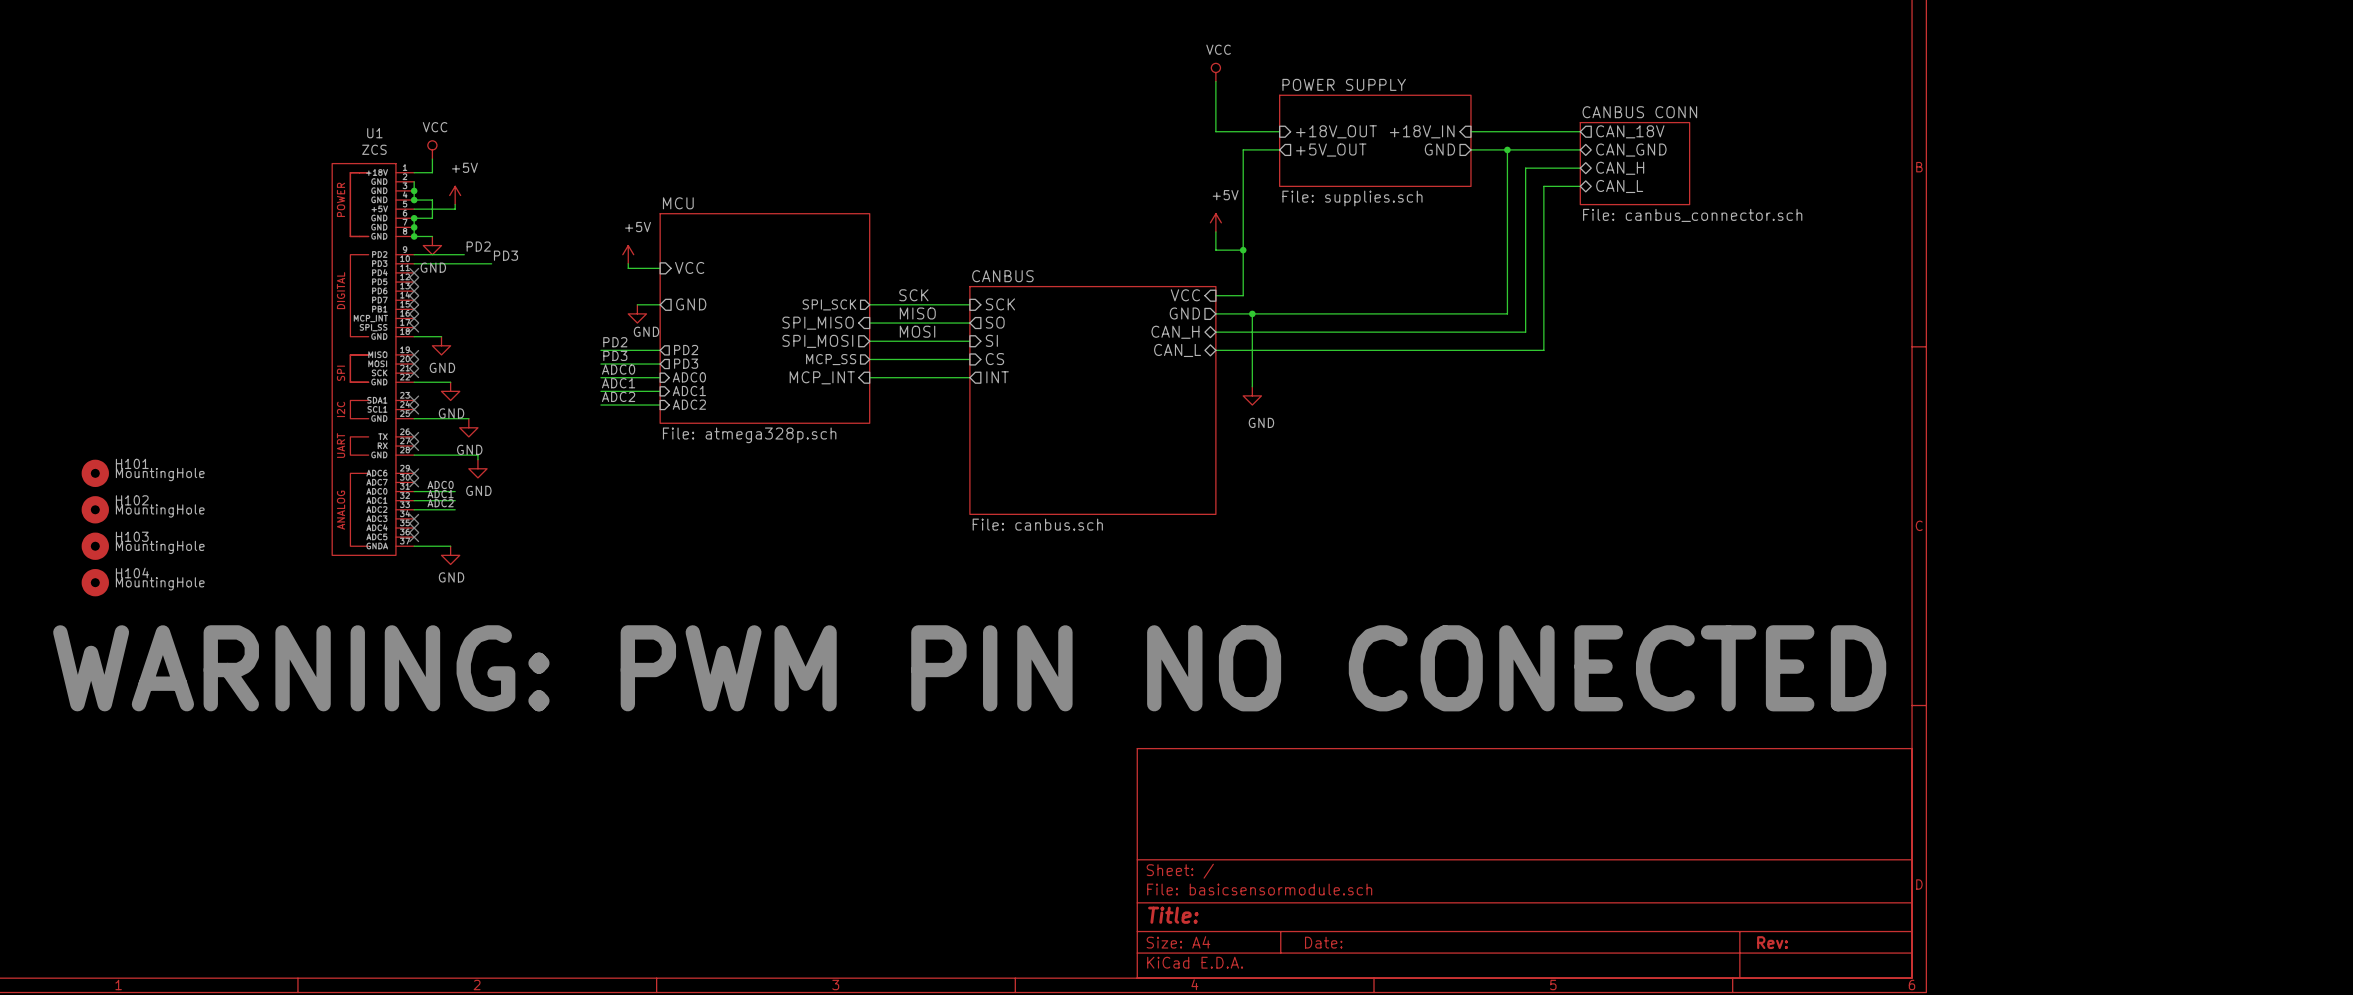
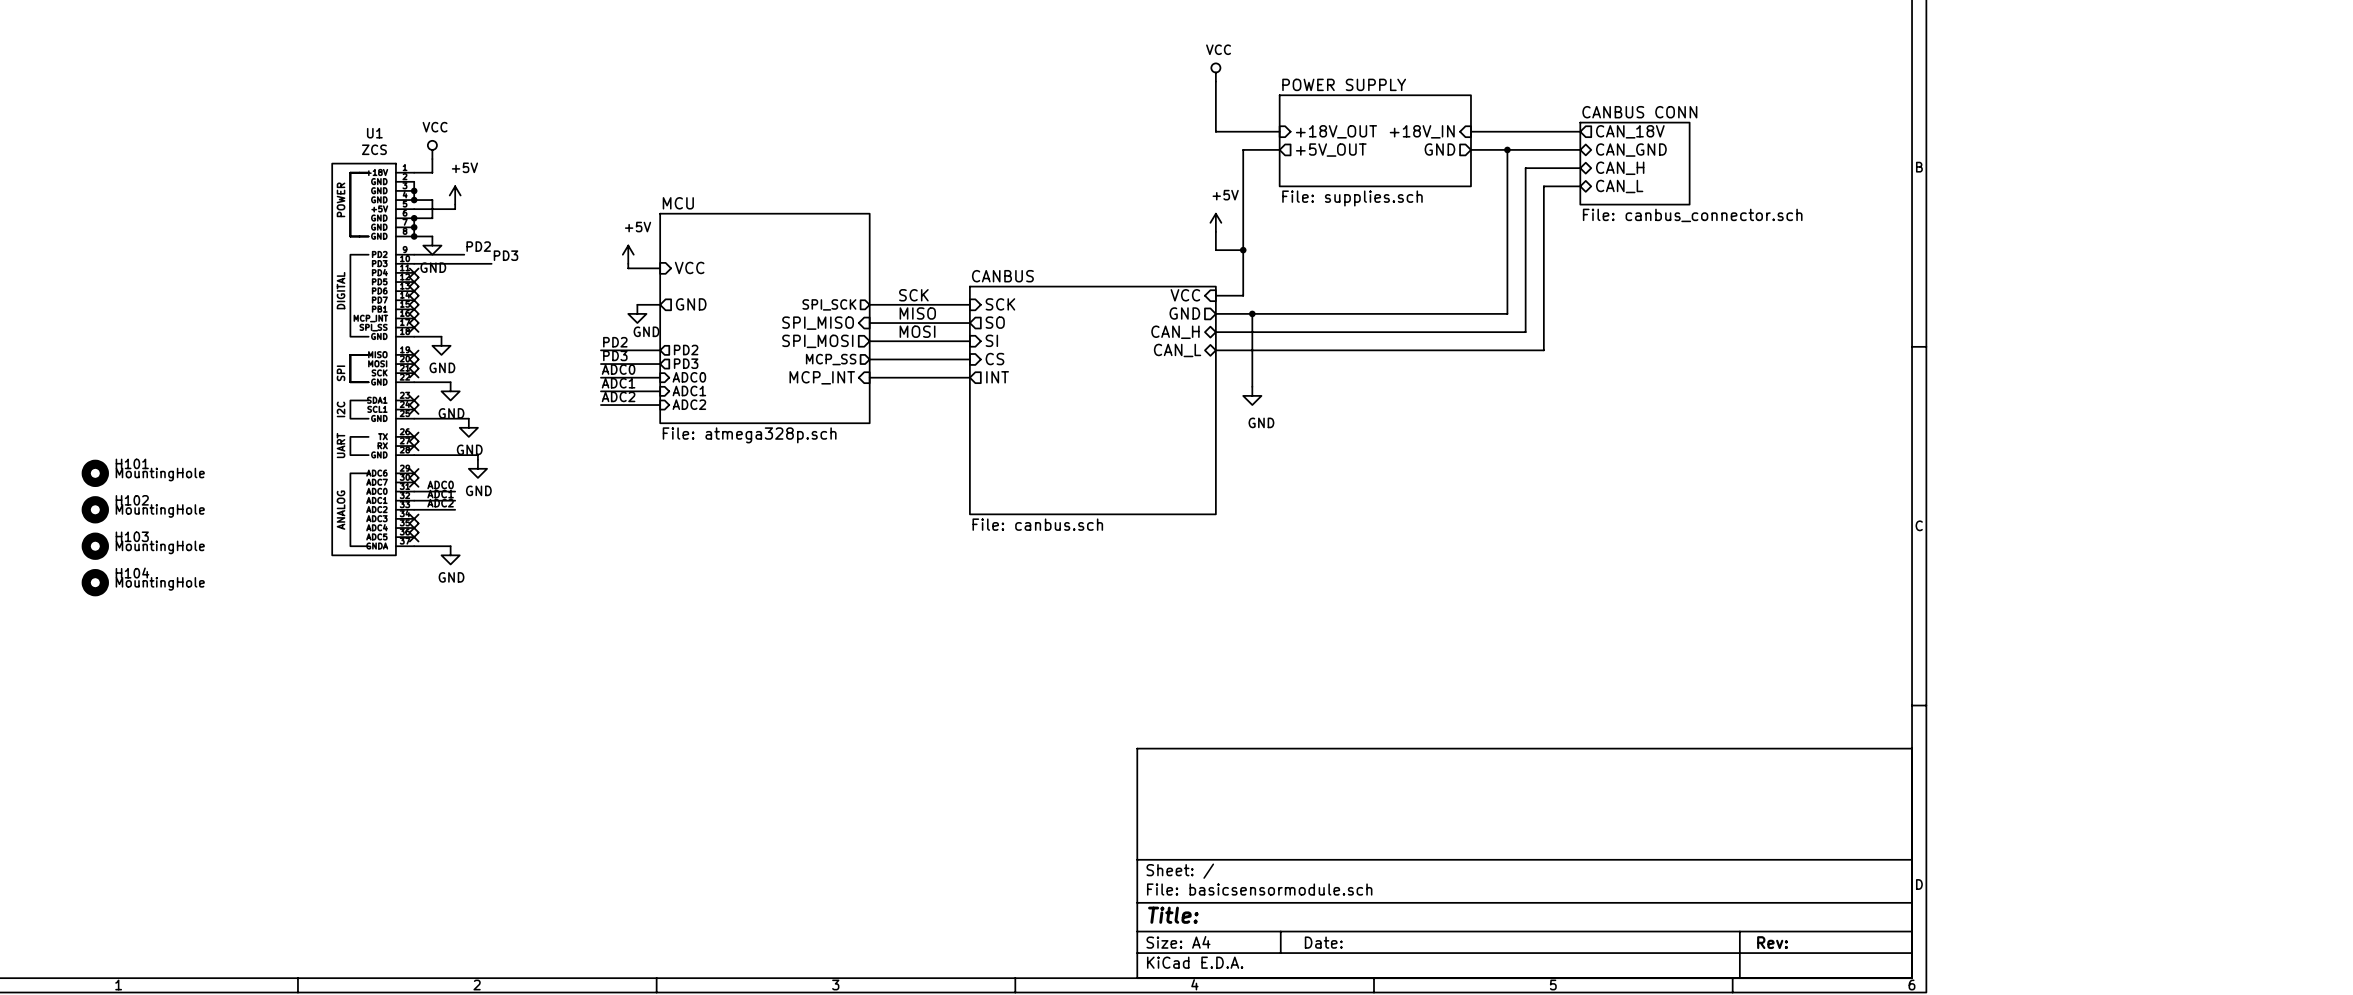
text: WARNING: PWM PIN NO CONECTED (969, 668) -> none

